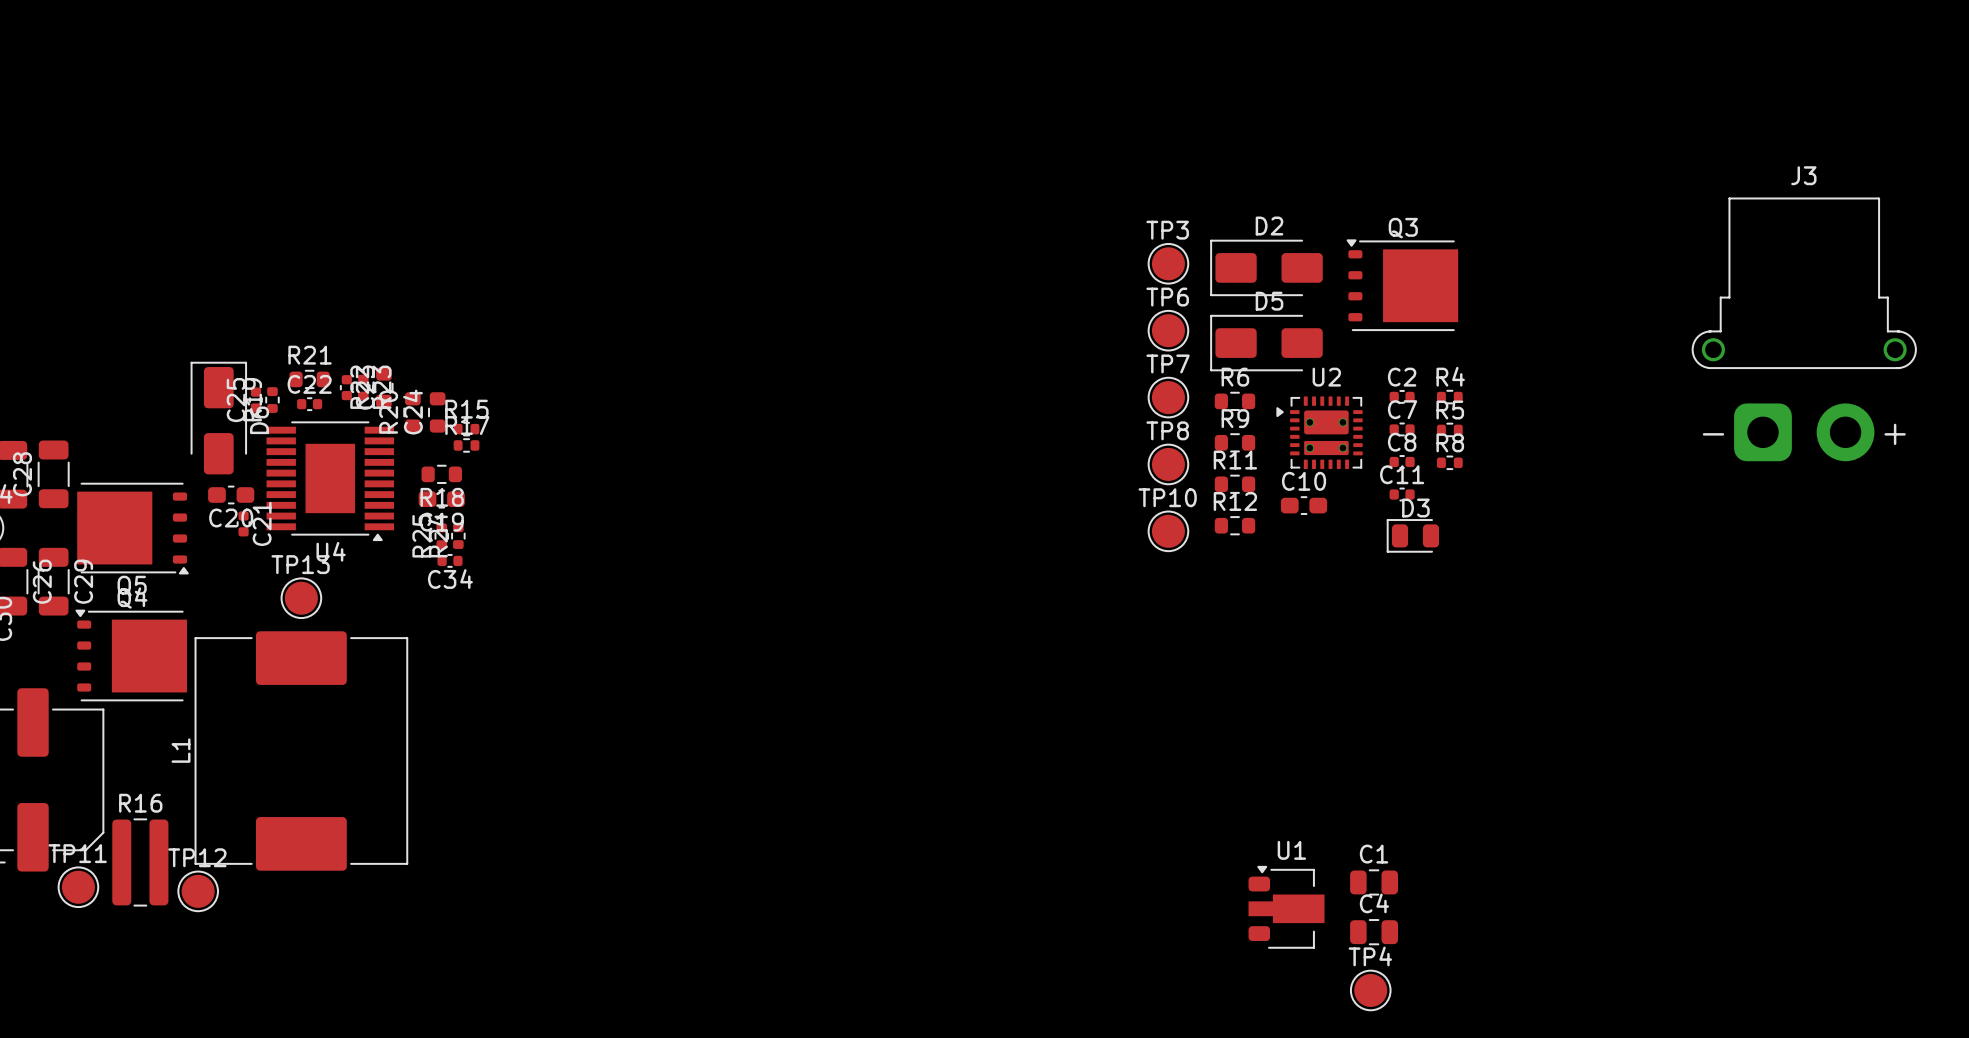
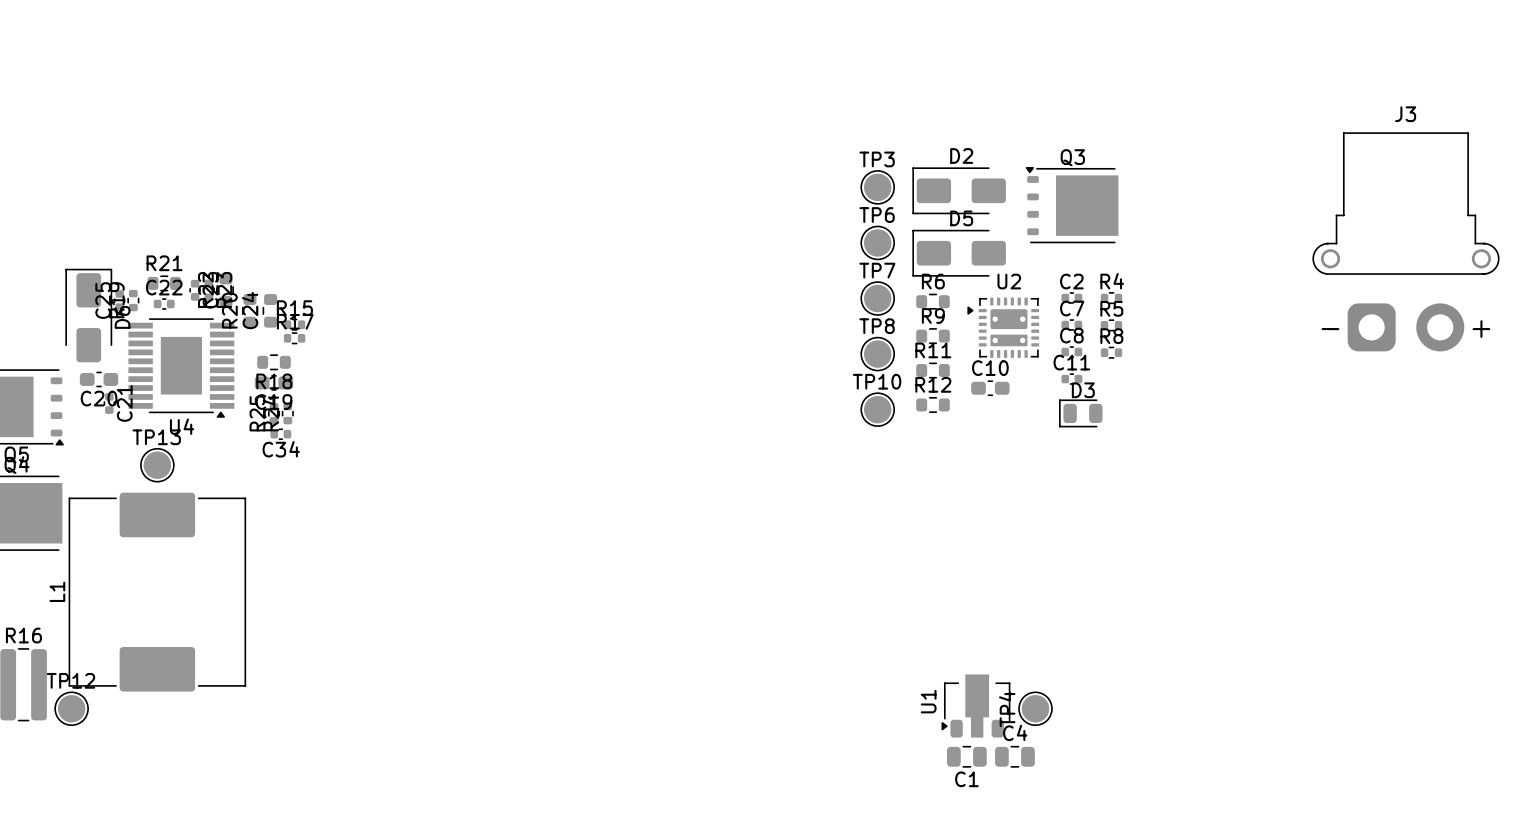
C1 name position: C1 (1374, 854) -> C1 (966, 779)
C1 position: (1374, 882) -> (966, 756)
U1 rotation: 0° (1286, 907) -> 90° counterclockwise (975, 706)
C4 position: (1374, 932) -> (1014, 756)
TP4 name rotation: 0° (1370, 956) -> 90° counterclockwise (1007, 709)
TP4 position: (1370, 990) -> (1035, 708)

